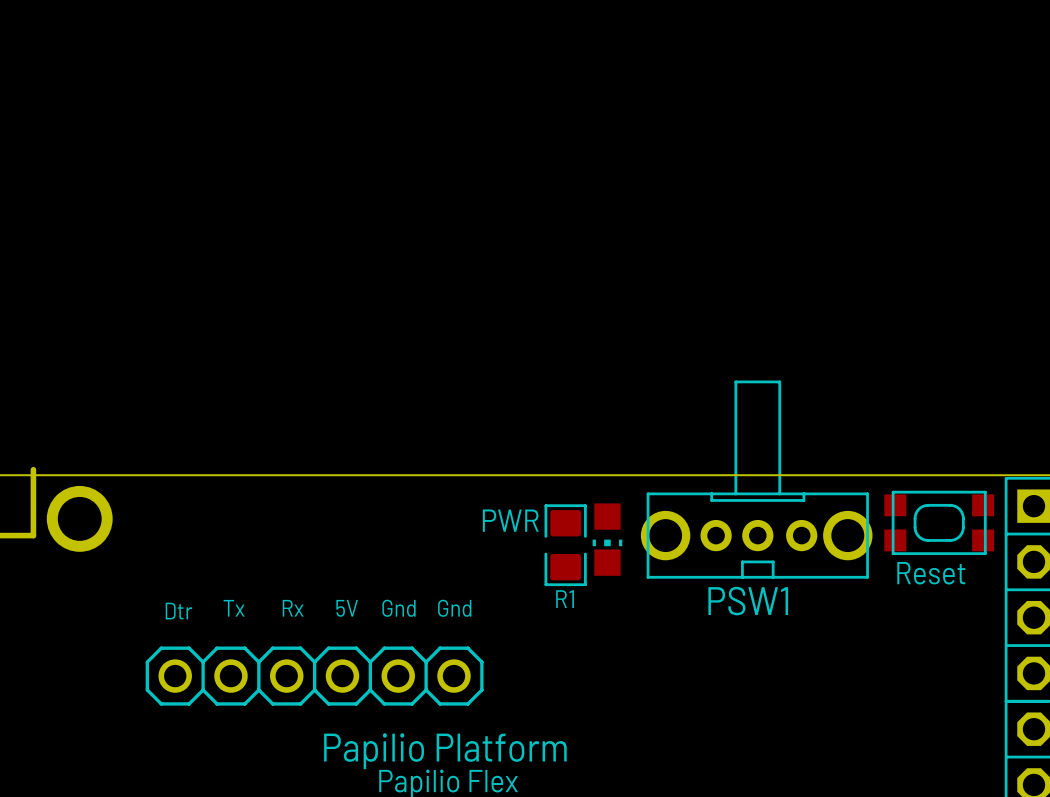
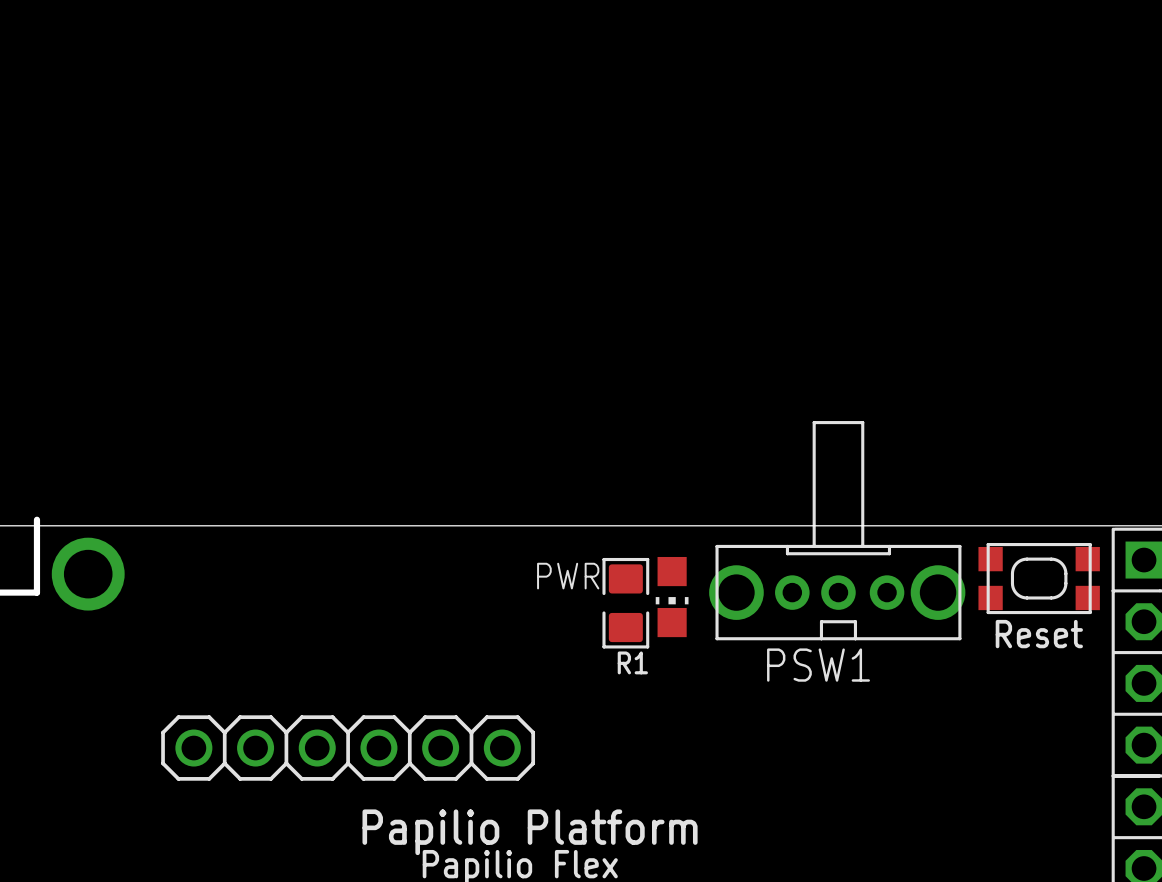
text: Tx (234, 608) -> none
text: Rx (293, 608) -> none
text: 5V (347, 608) -> none
text: Gnd (398, 608) -> none
text: Gnd (454, 608) -> none
text: Dtr (178, 611) -> none

